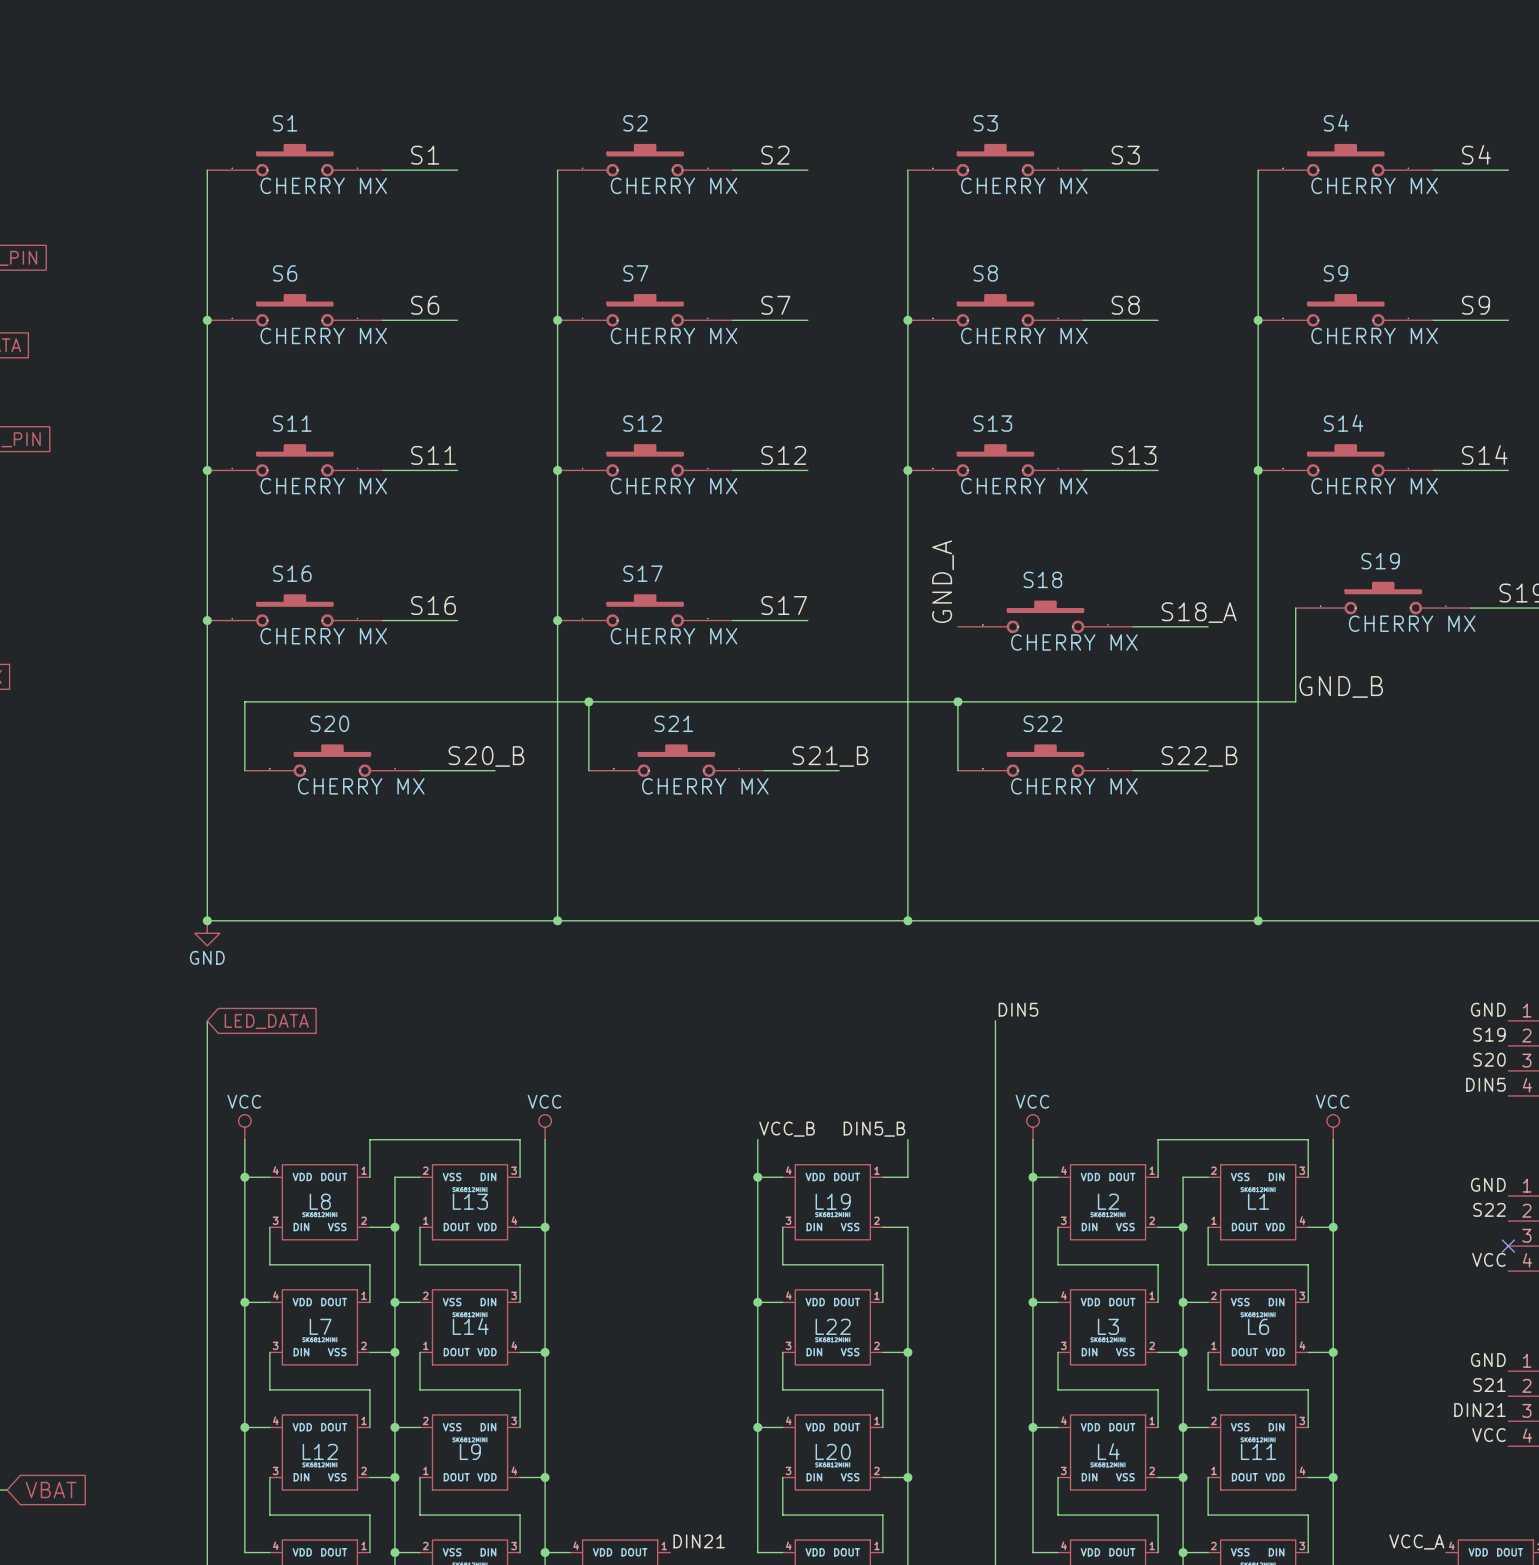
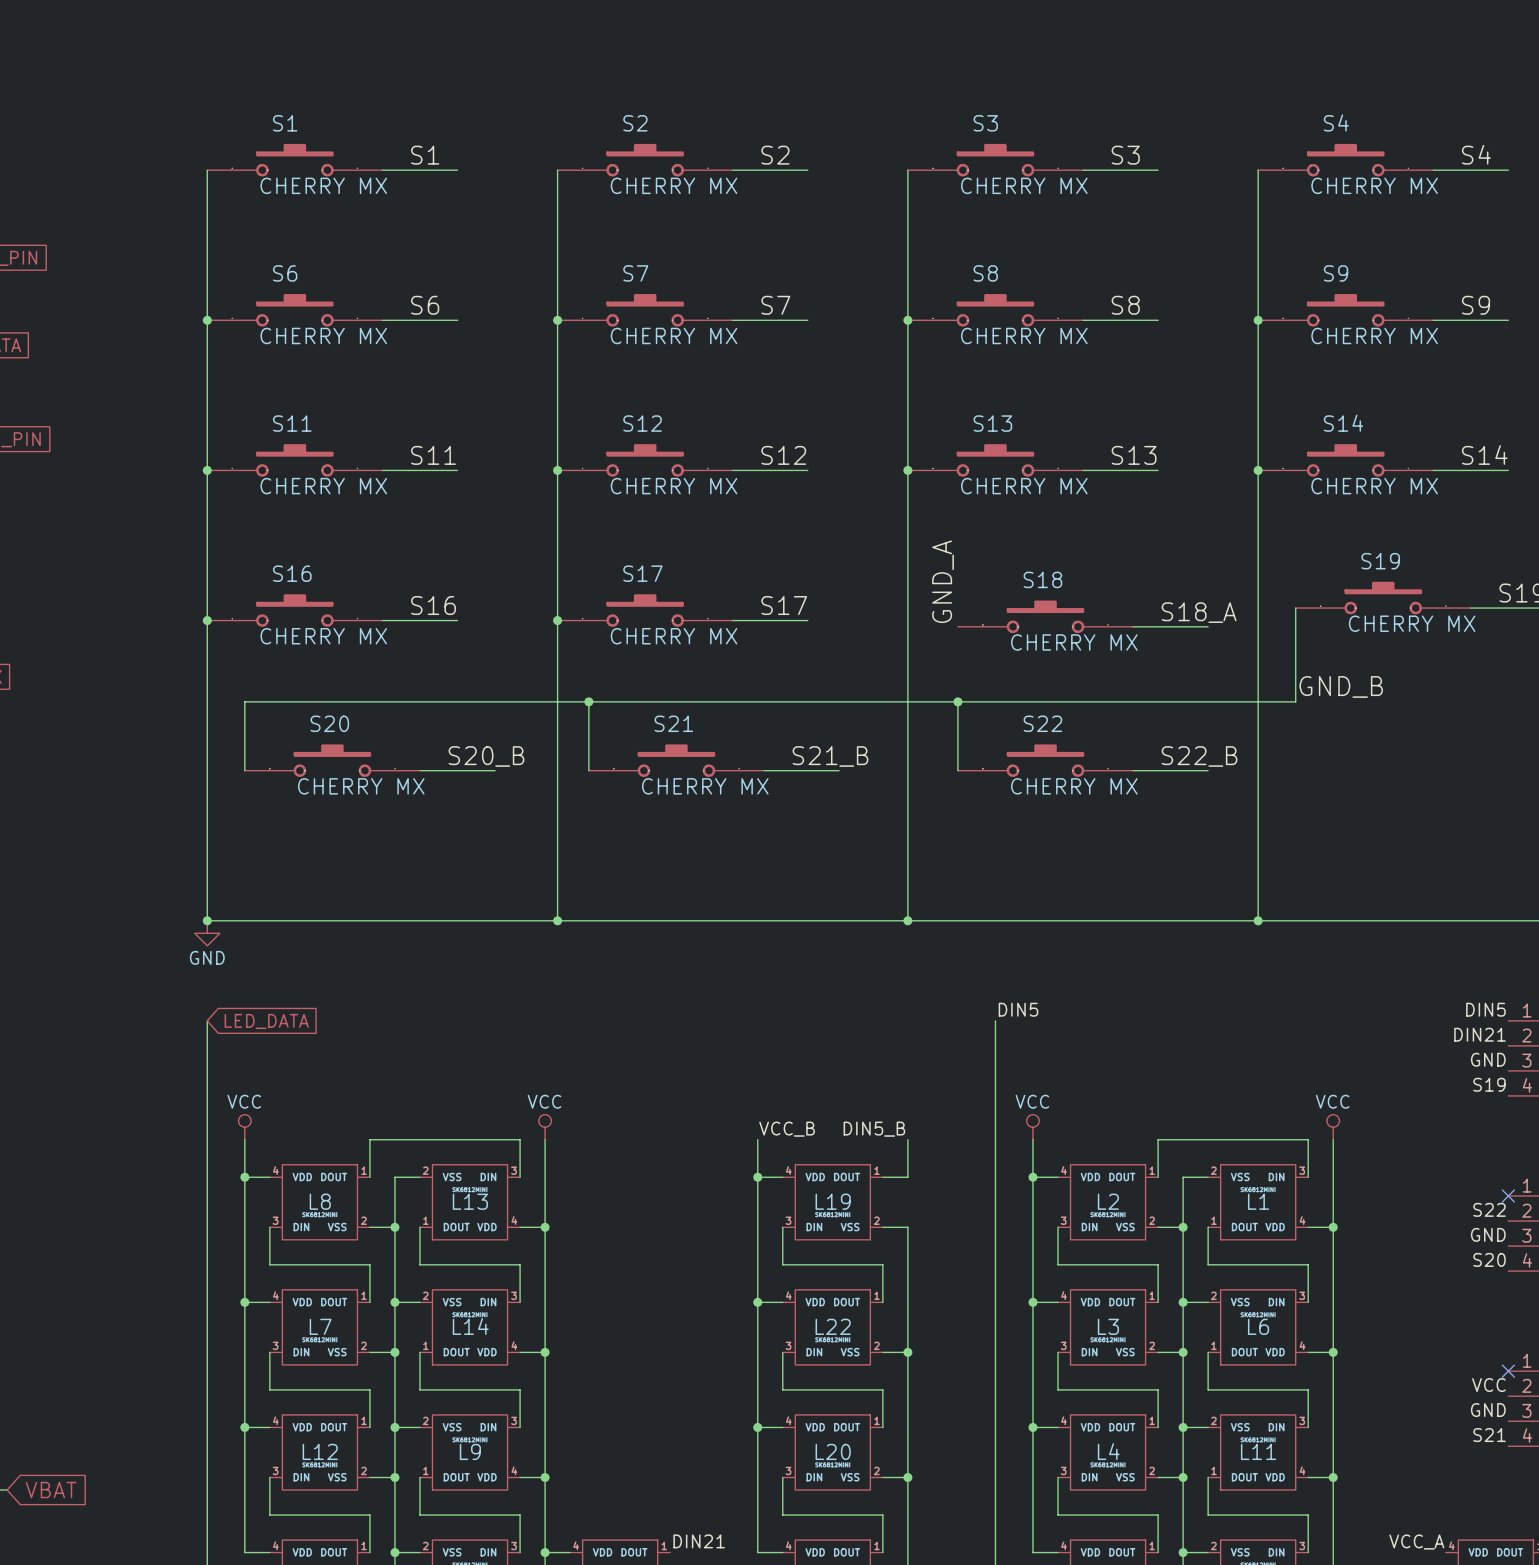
label: GND (1488, 1009) -> DIN5 (1485, 1009)
label: S19 (1489, 1034) -> DIN21 (1479, 1034)
label: S20 (1489, 1059) -> GND (1488, 1059)
label: DIN5 (1485, 1084) -> S19 (1489, 1084)
label position: GND (1488, 1184) -> GND (1488, 1234)
no-connect mark position: (1508, 1246) -> (1508, 1196)
label: VCC (1488, 1259) -> S20 (1489, 1259)
label: GND (1488, 1360) -> none
no-connect mark: none -> (1508, 1371)
label: S21 (1489, 1385) -> VCC (1488, 1385)
label: DIN21 (1479, 1410) -> GND (1488, 1410)
label: VCC (1488, 1435) -> S21 (1489, 1435)

